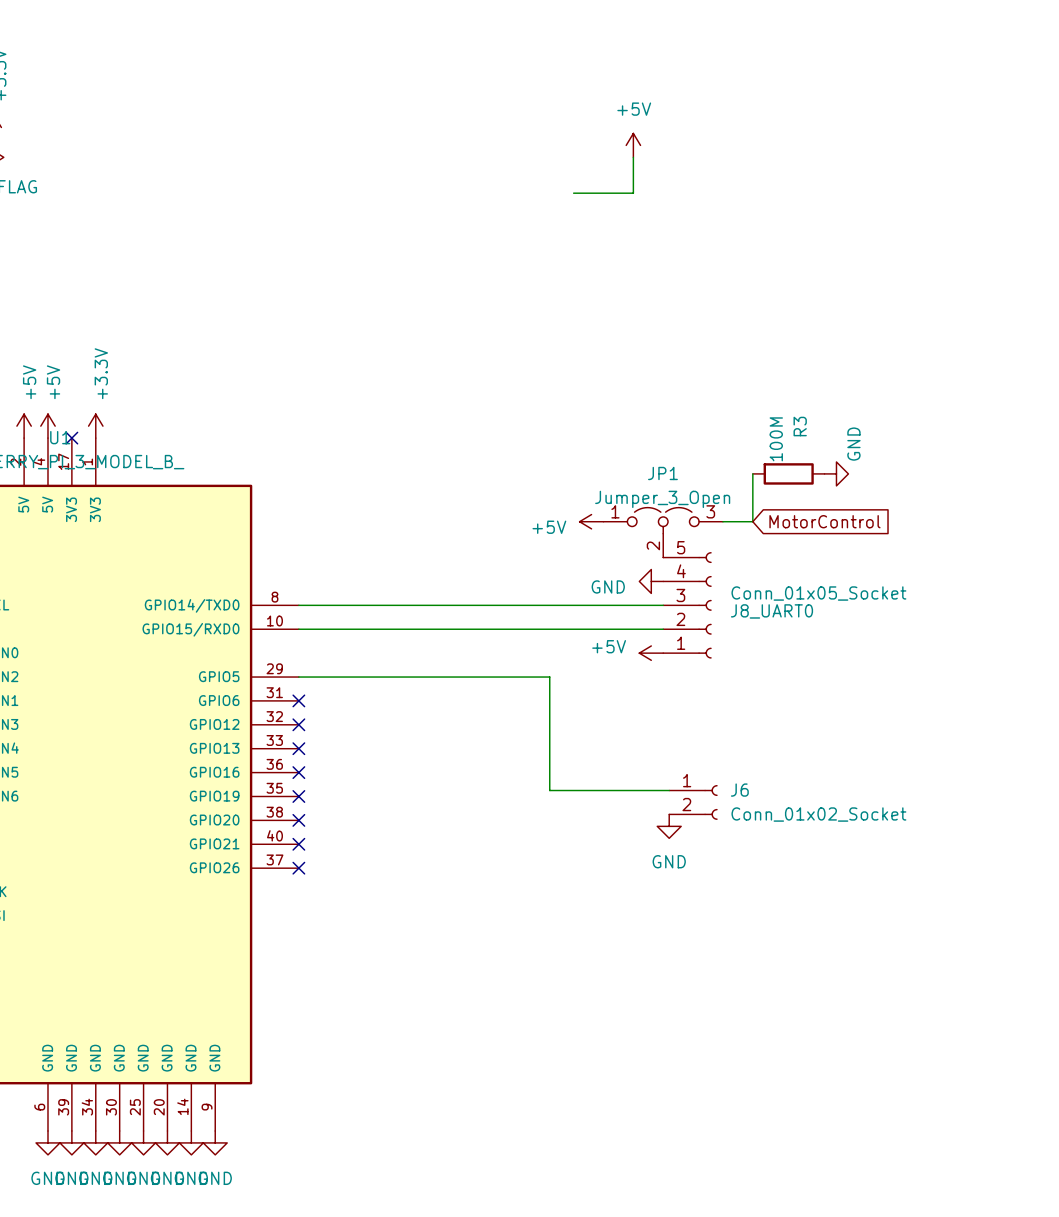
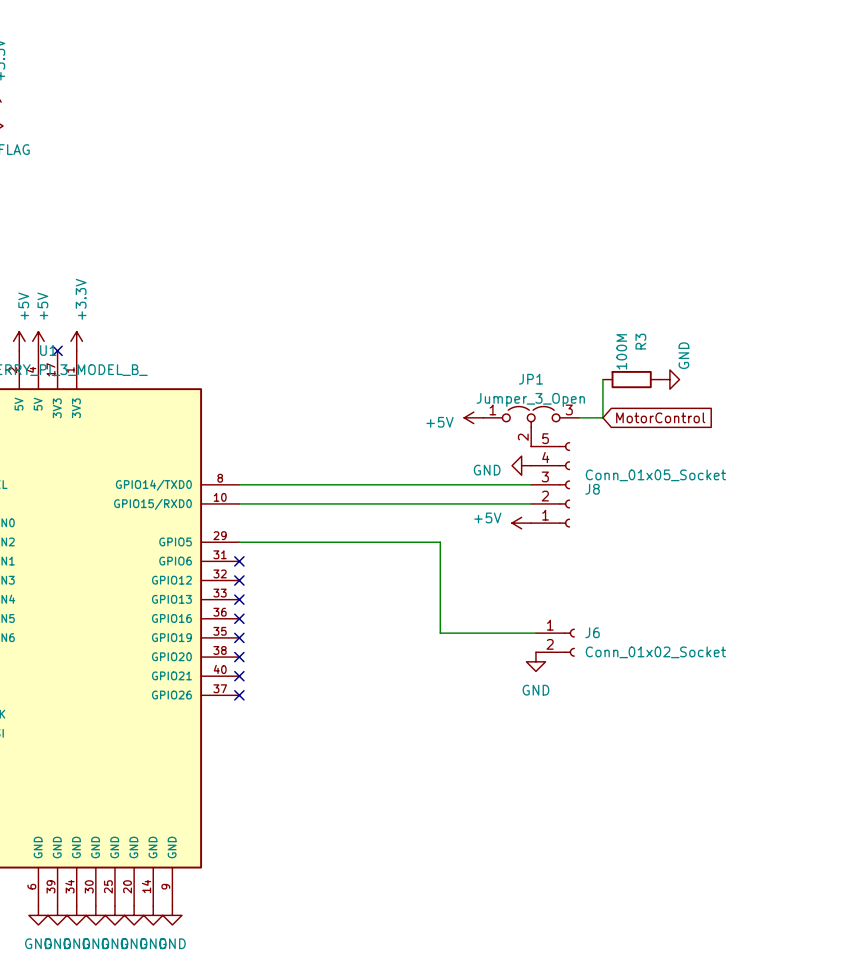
power symbol: +5V (633, 145) -> none
wire: (633, 157) (633, 193) (573, 193) -> none
J8_UART0 name: J8_UART0 (771, 611) -> J8 (592, 489)

